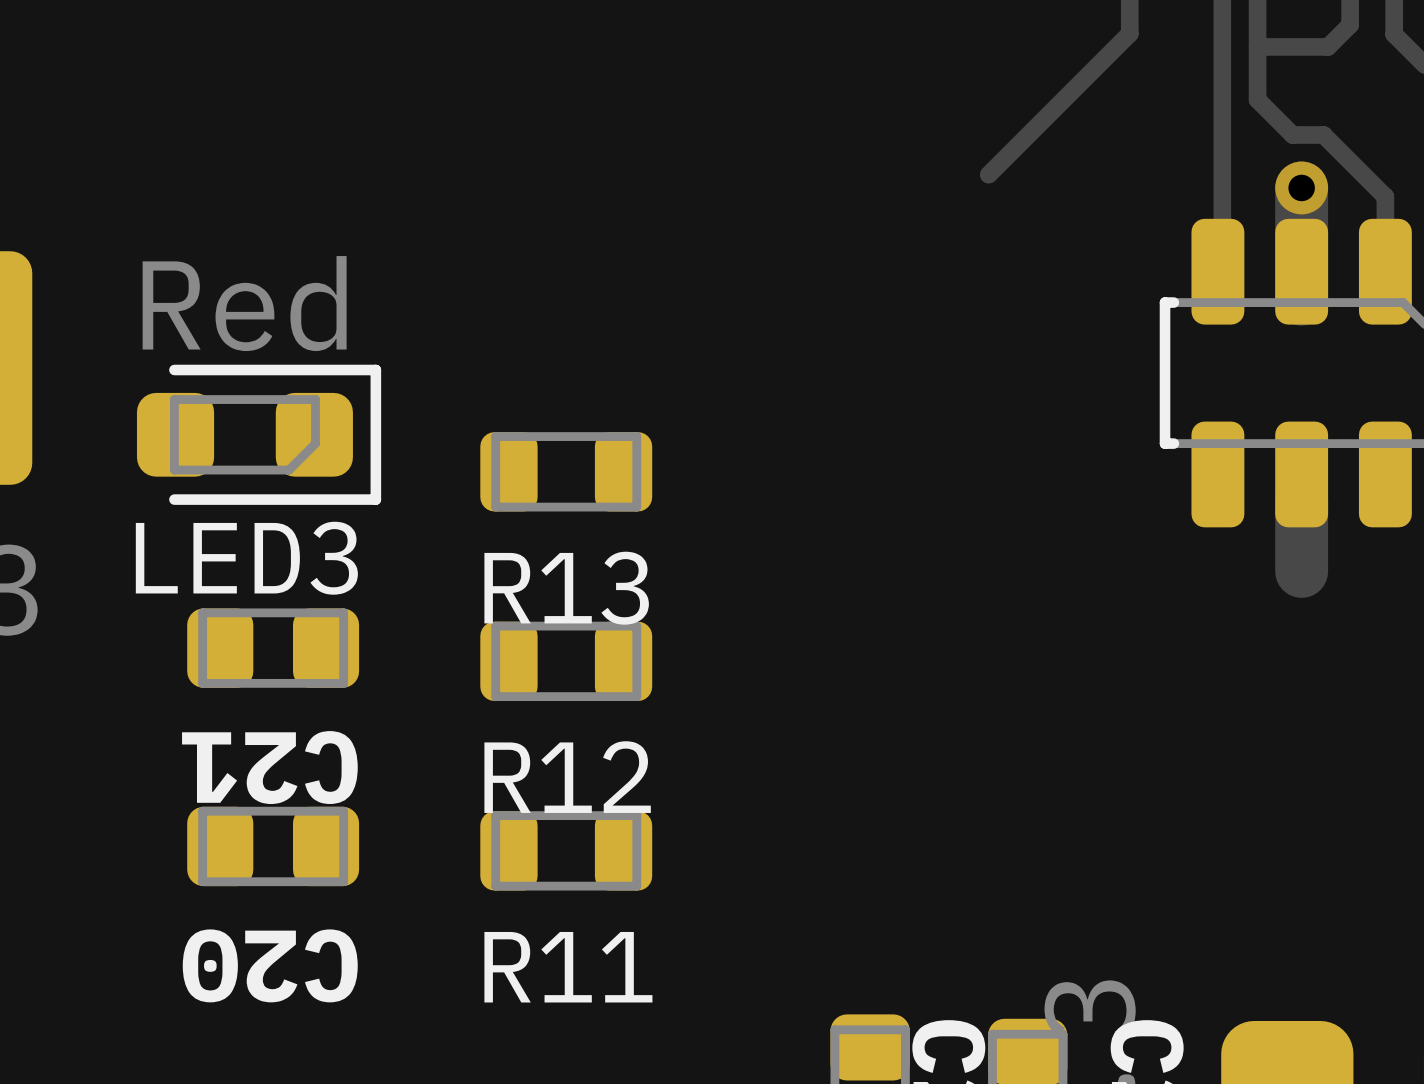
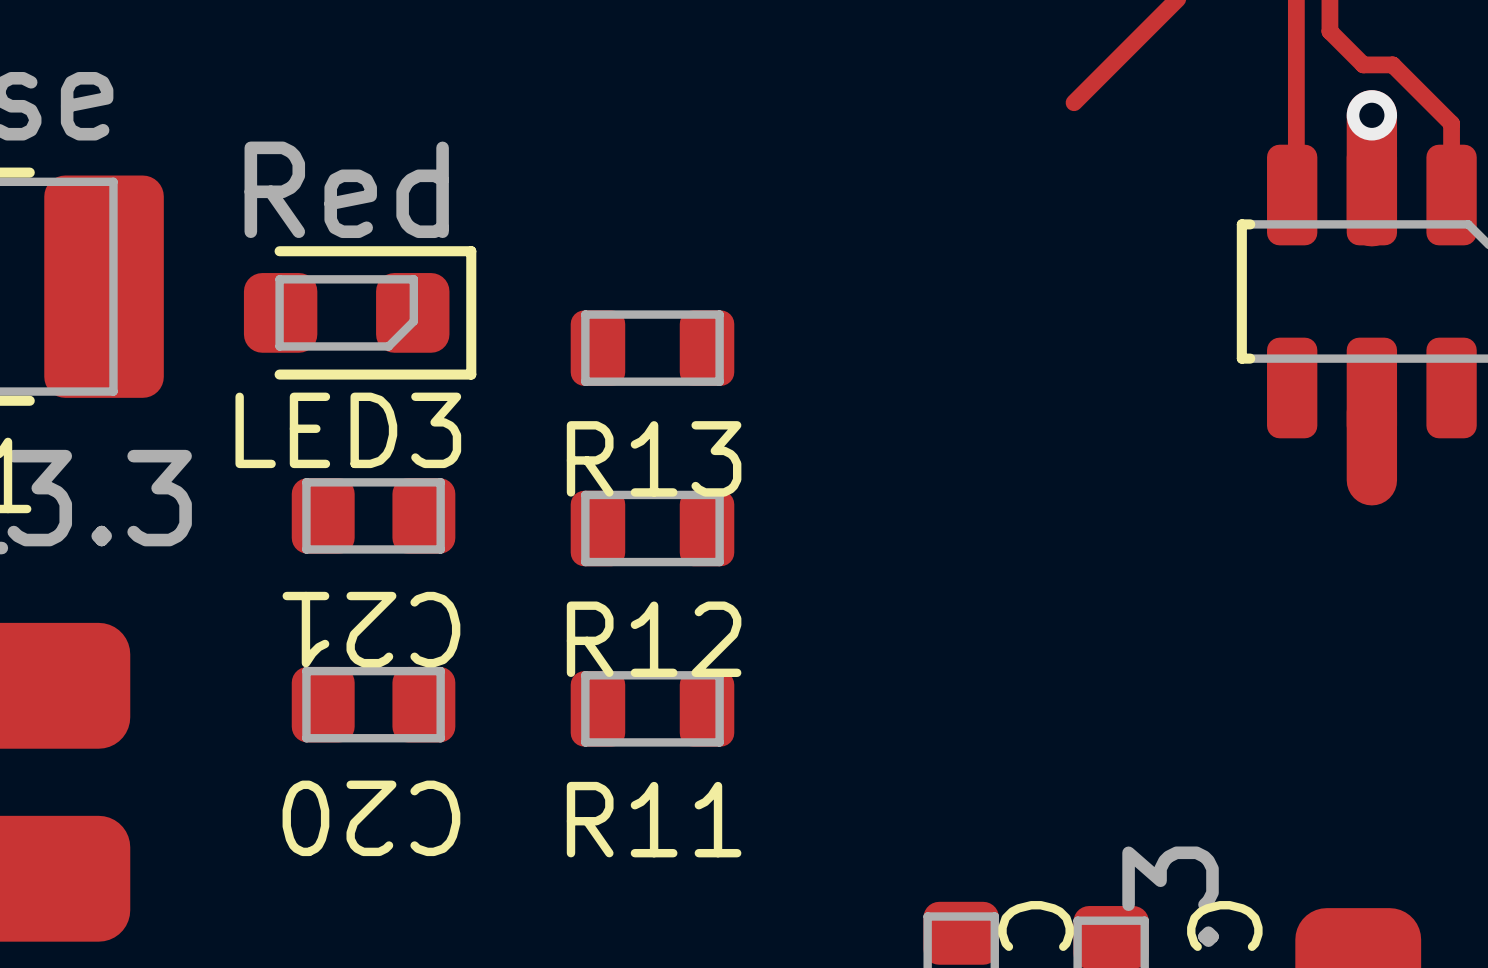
LED3 position: (259, 434) -> (360, 312)
R13 position: (566, 471) -> (652, 348)
C21 position: (273, 648) -> (373, 515)
R12 position: (566, 661) -> (652, 528)
C20 position: (273, 846) -> (373, 704)
R11 position: (566, 850) -> (652, 708)

